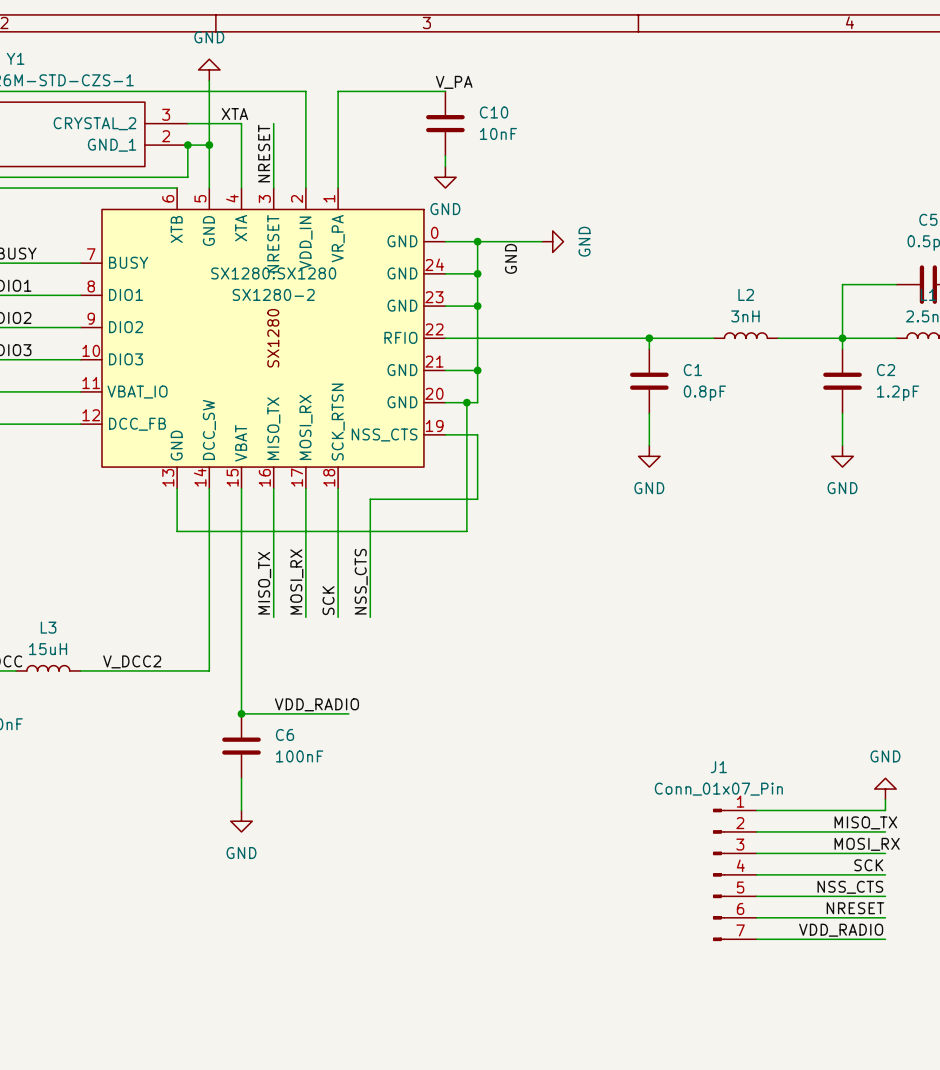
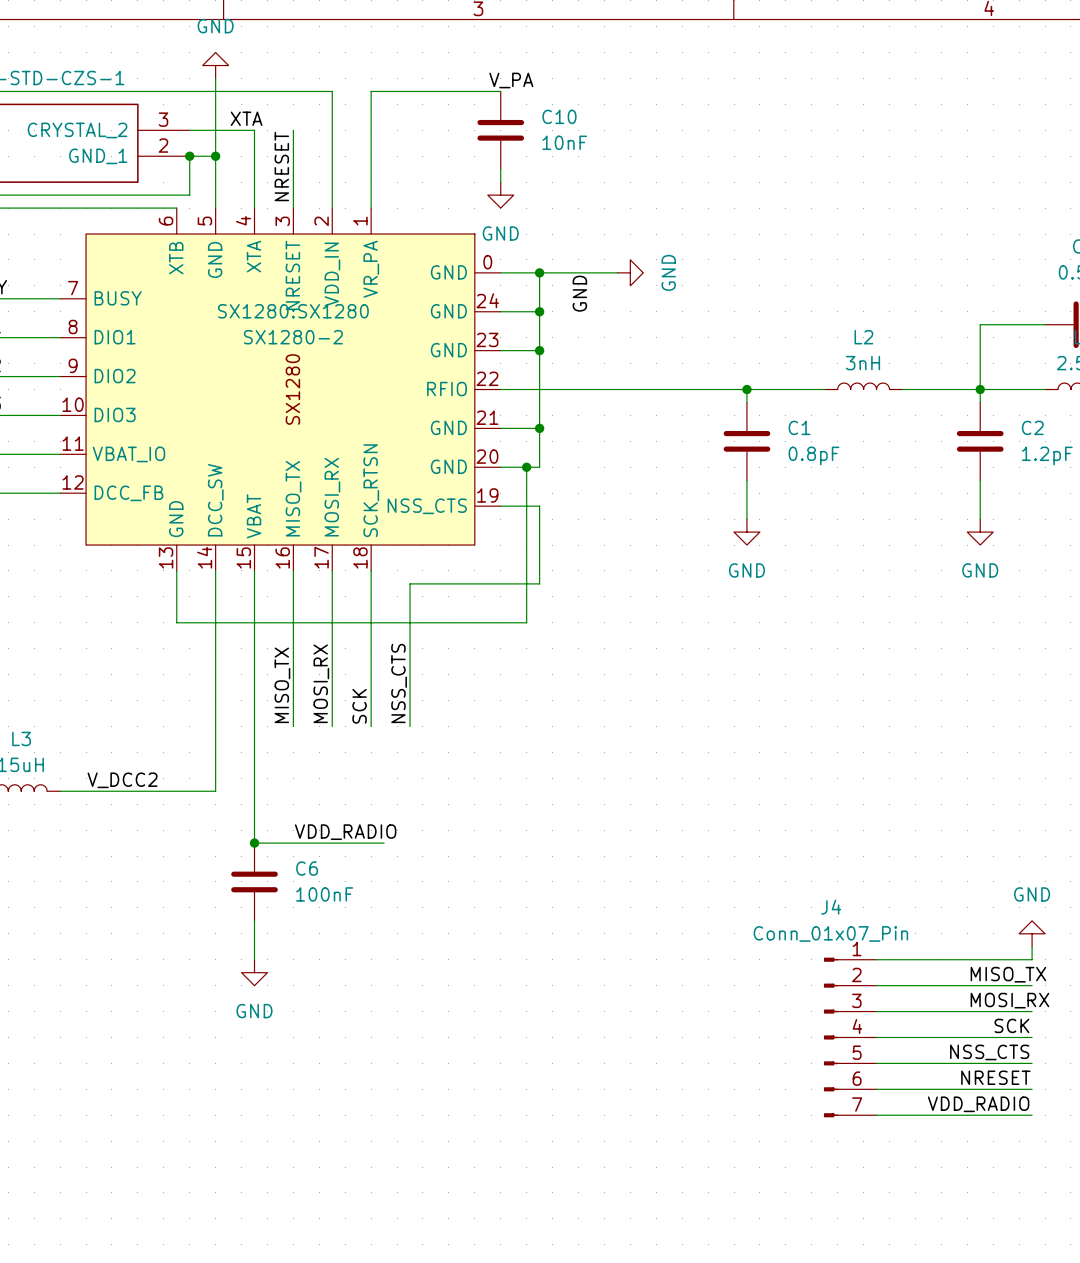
J1 name: J1 (718, 767) -> J4 (831, 907)

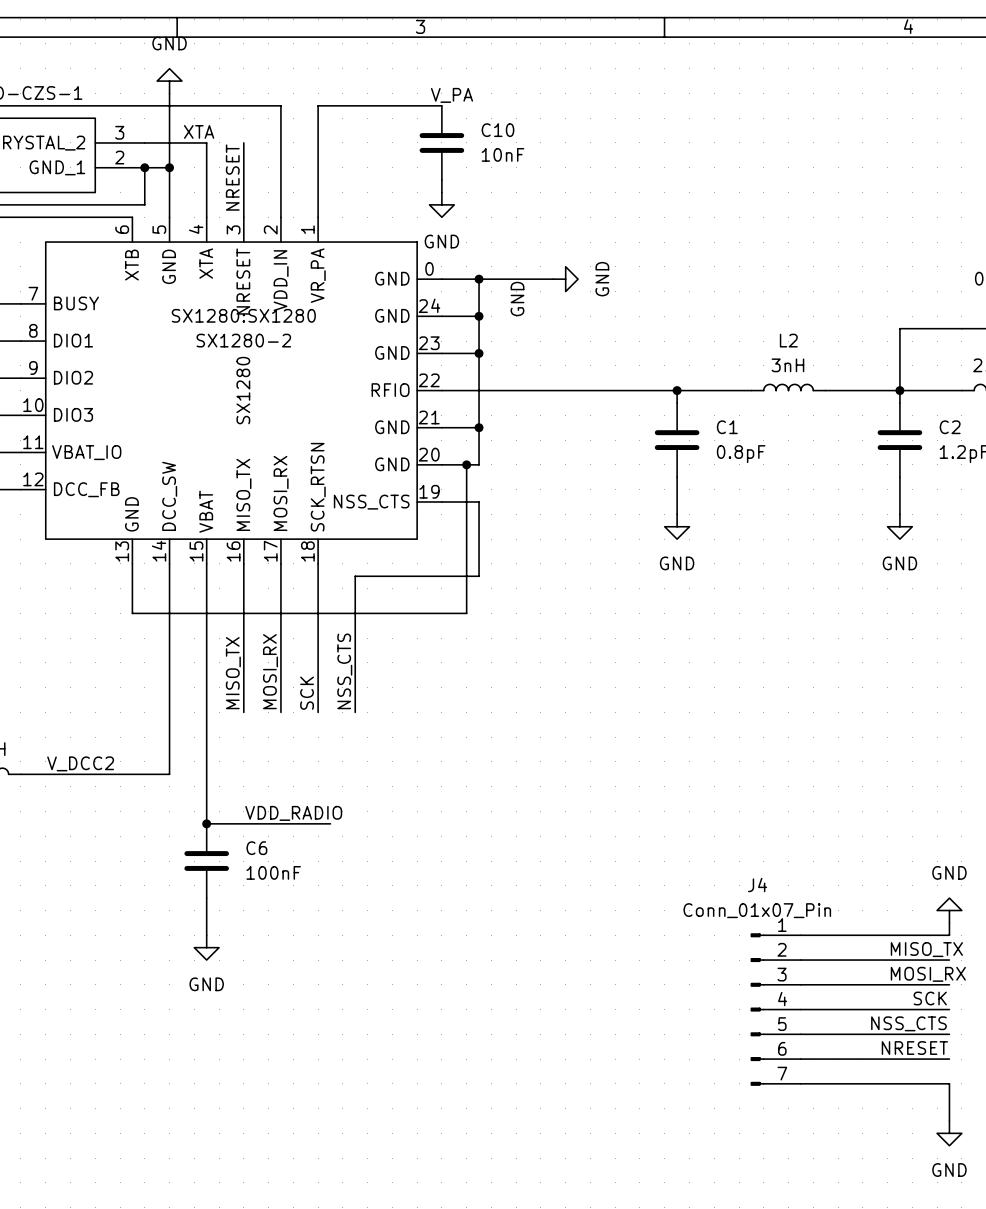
label: VDD_RADIO (978, 1104) -> none
wire: none -> (949, 1083) (949, 1120)
power symbol: none -> GND (949, 1133)

